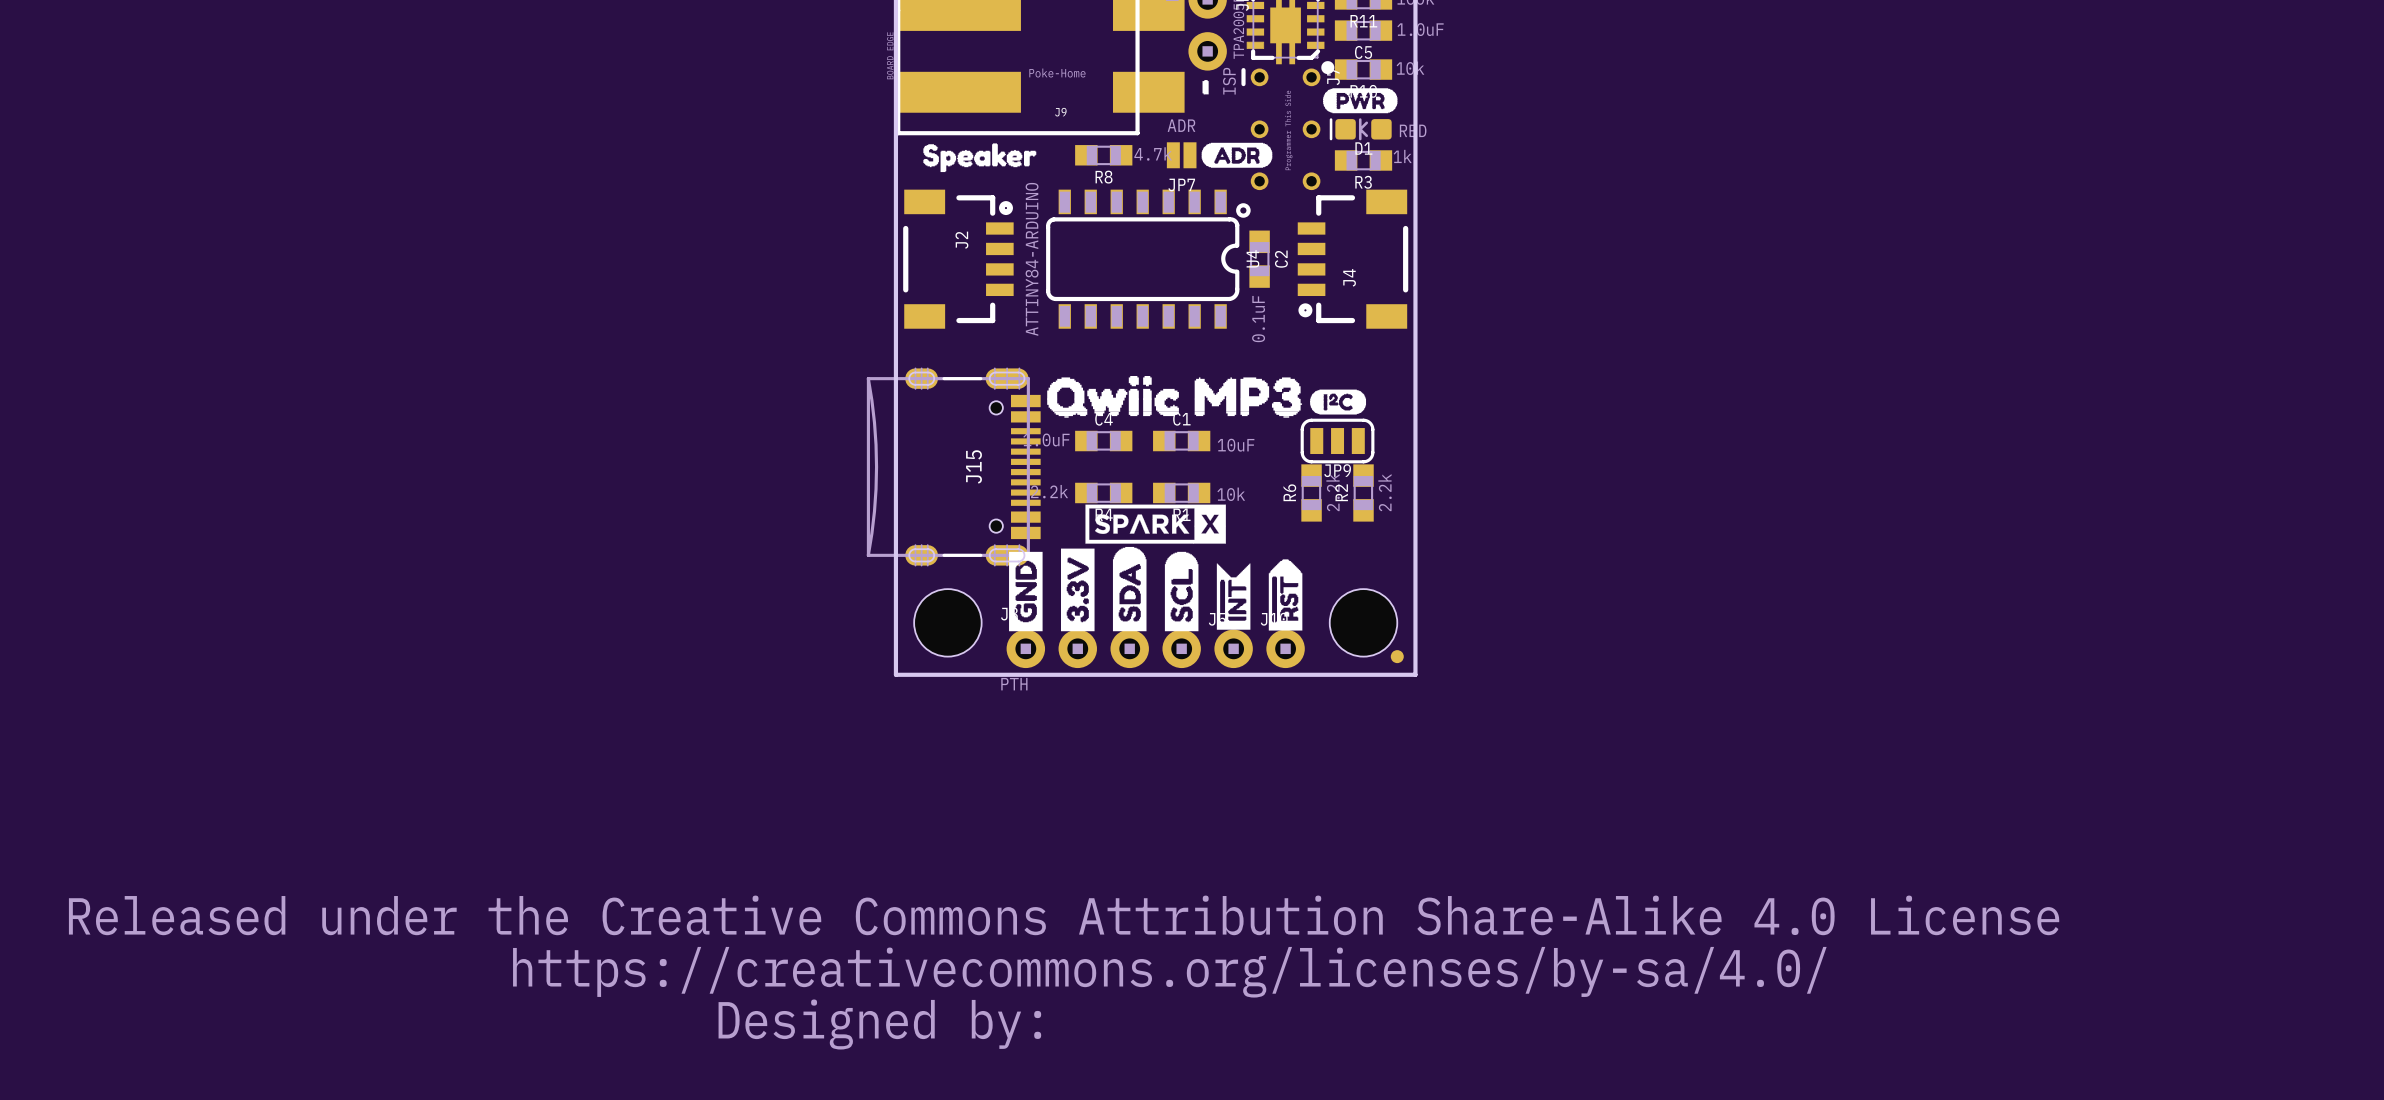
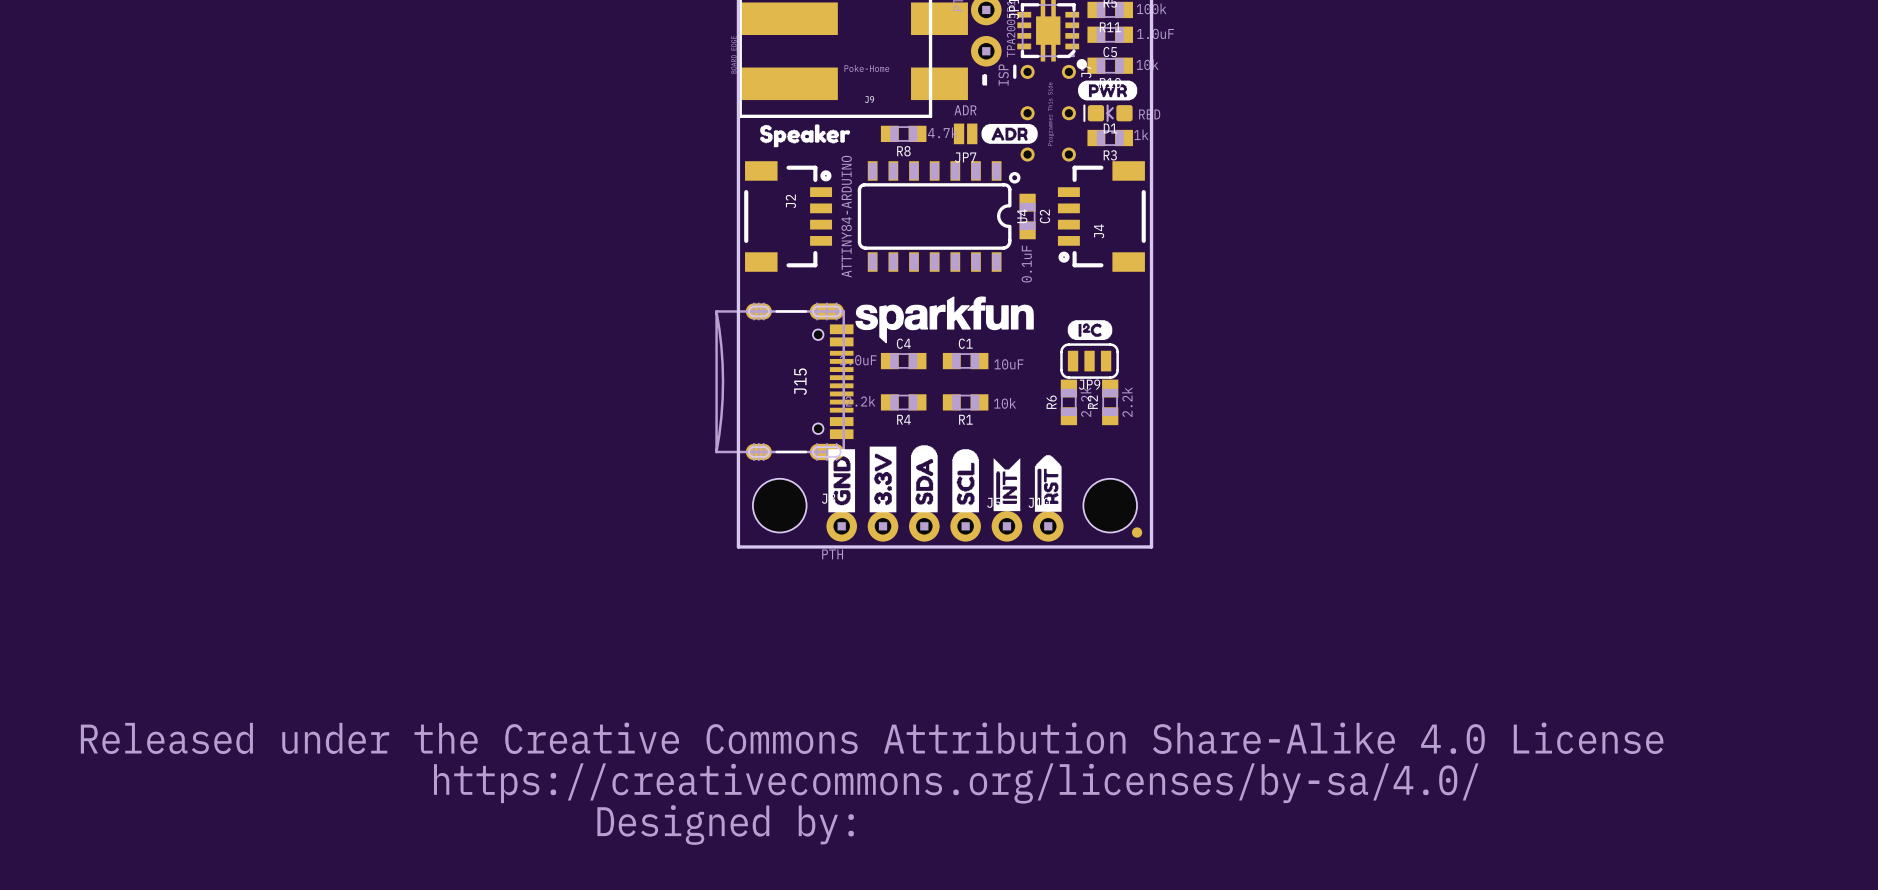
drawing: none -> [855, 296, 1034, 344]
drawing: [1047, 376, 1303, 418] -> none
drawing: [1085, 504, 1226, 544] -> none

